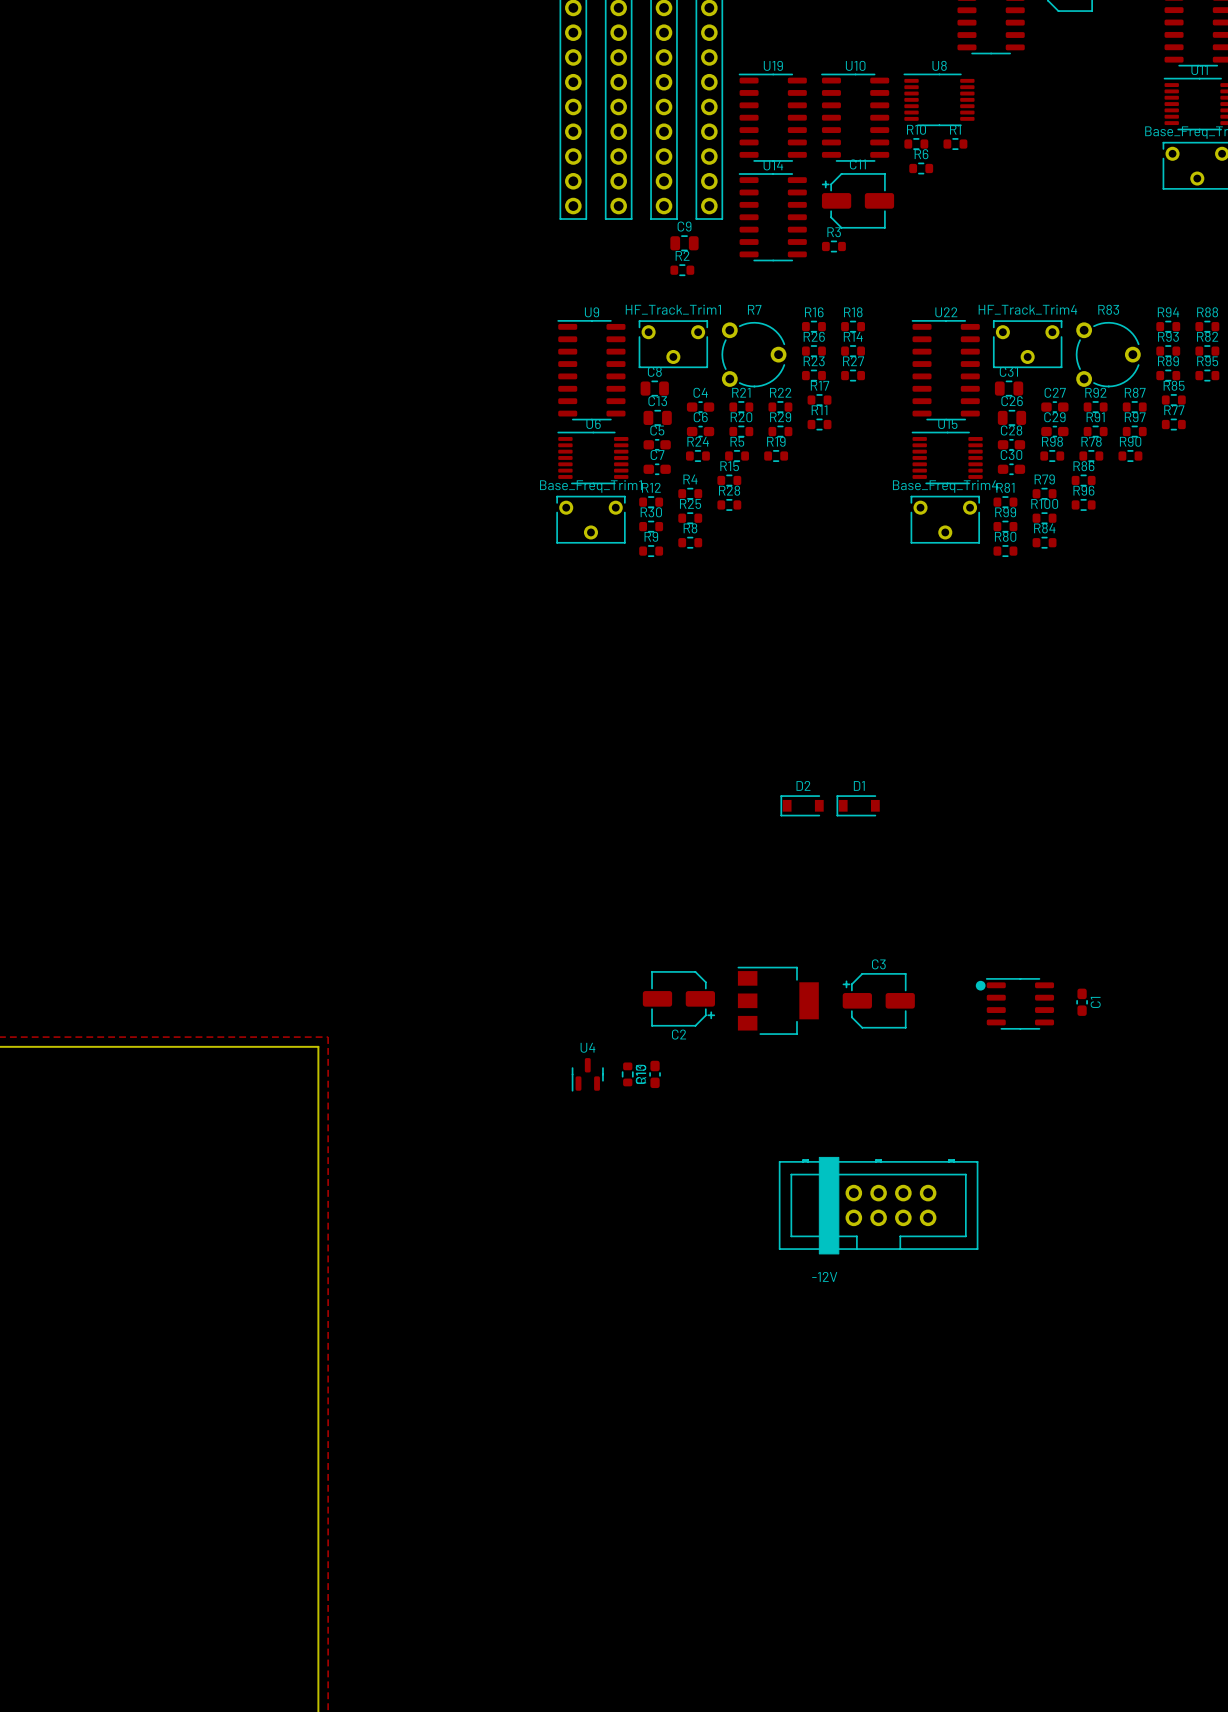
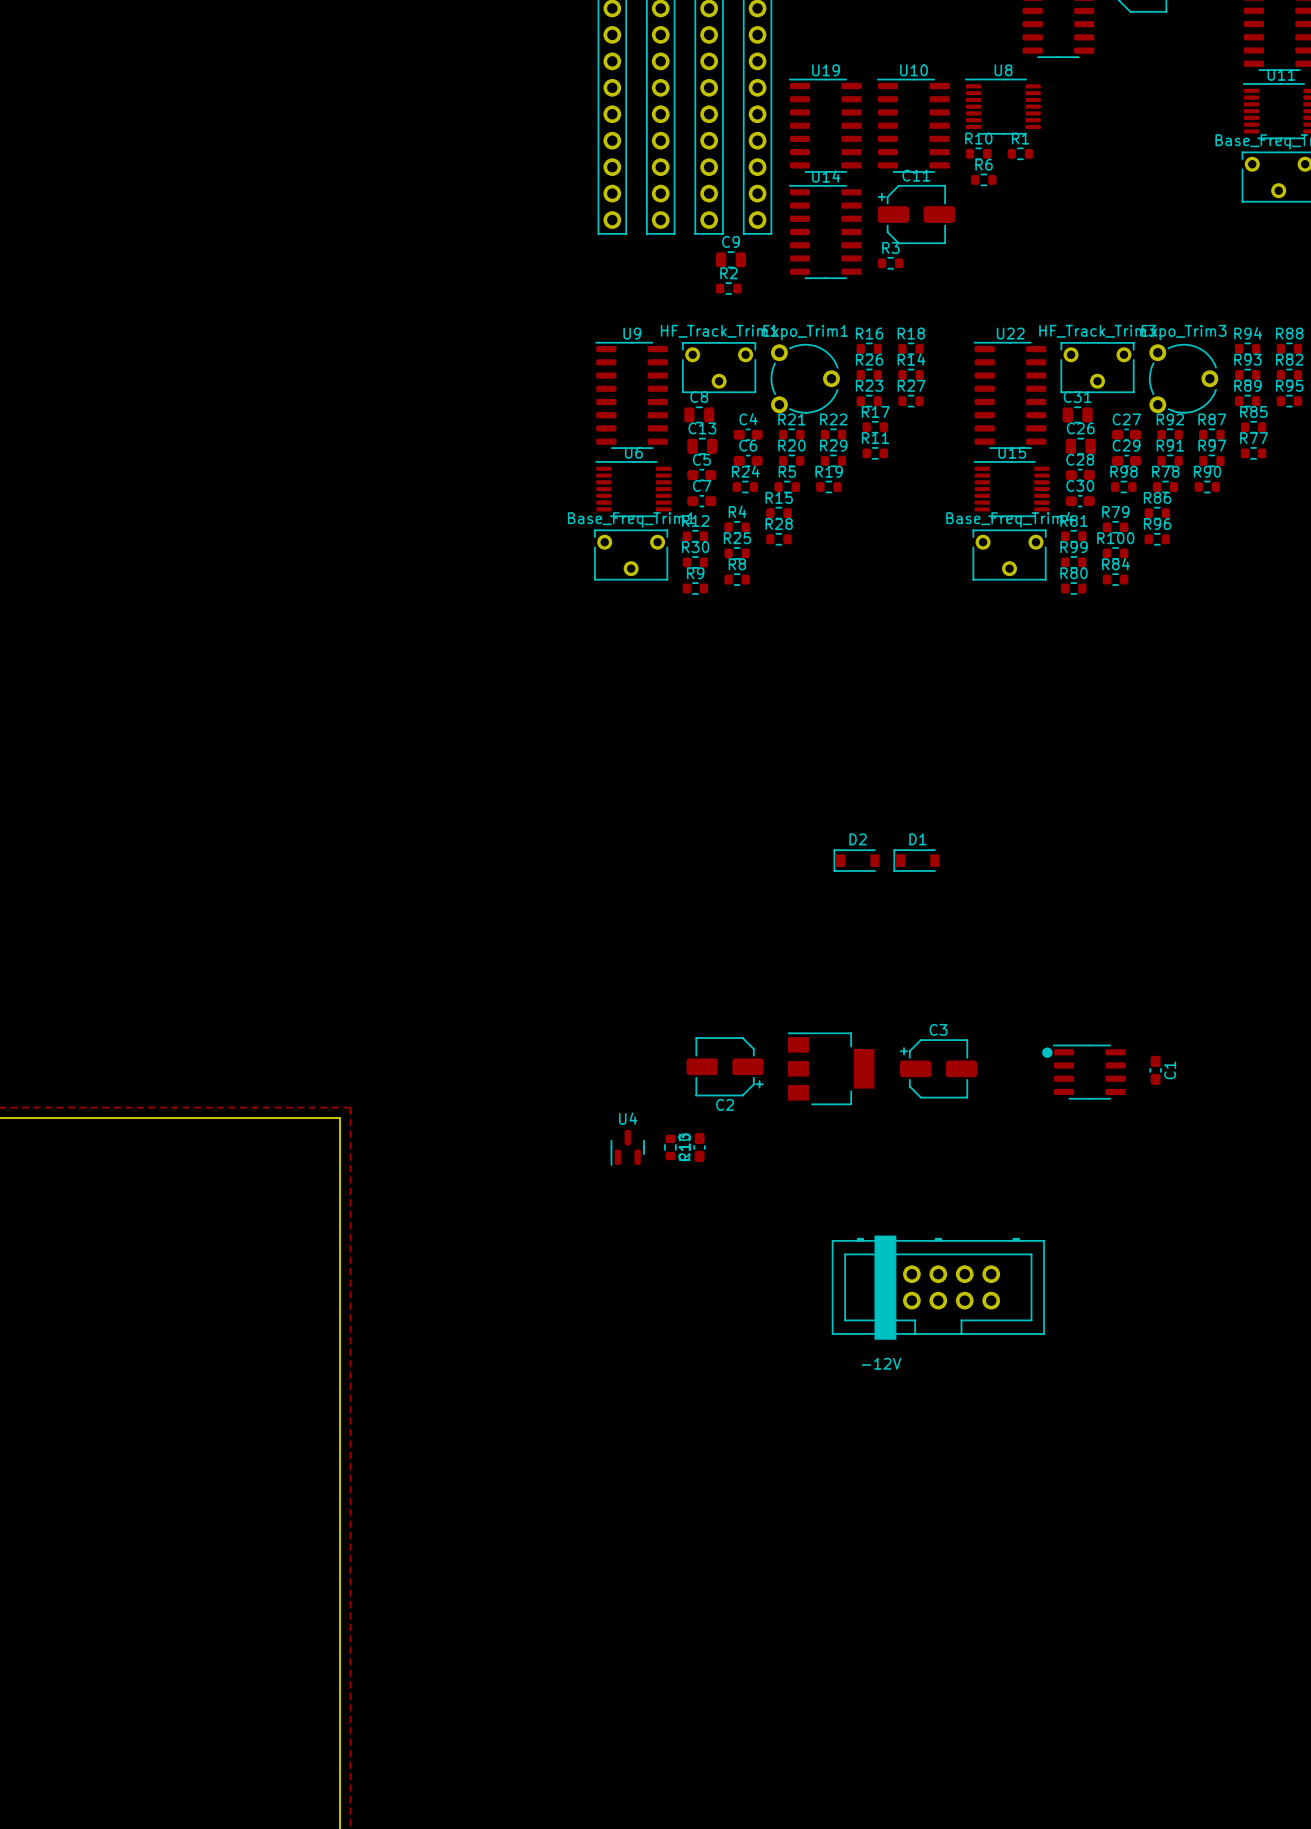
R7 name: R7 (754, 309) -> Expo_Trim1 (805, 332)
HF_Track_Trim4 name: HF_Track_Trim4 (1027, 309) -> HF_Track_Trim3 (1097, 331)
R83 name: R83 (1108, 309) -> Expo_Trim3 (1184, 332)

